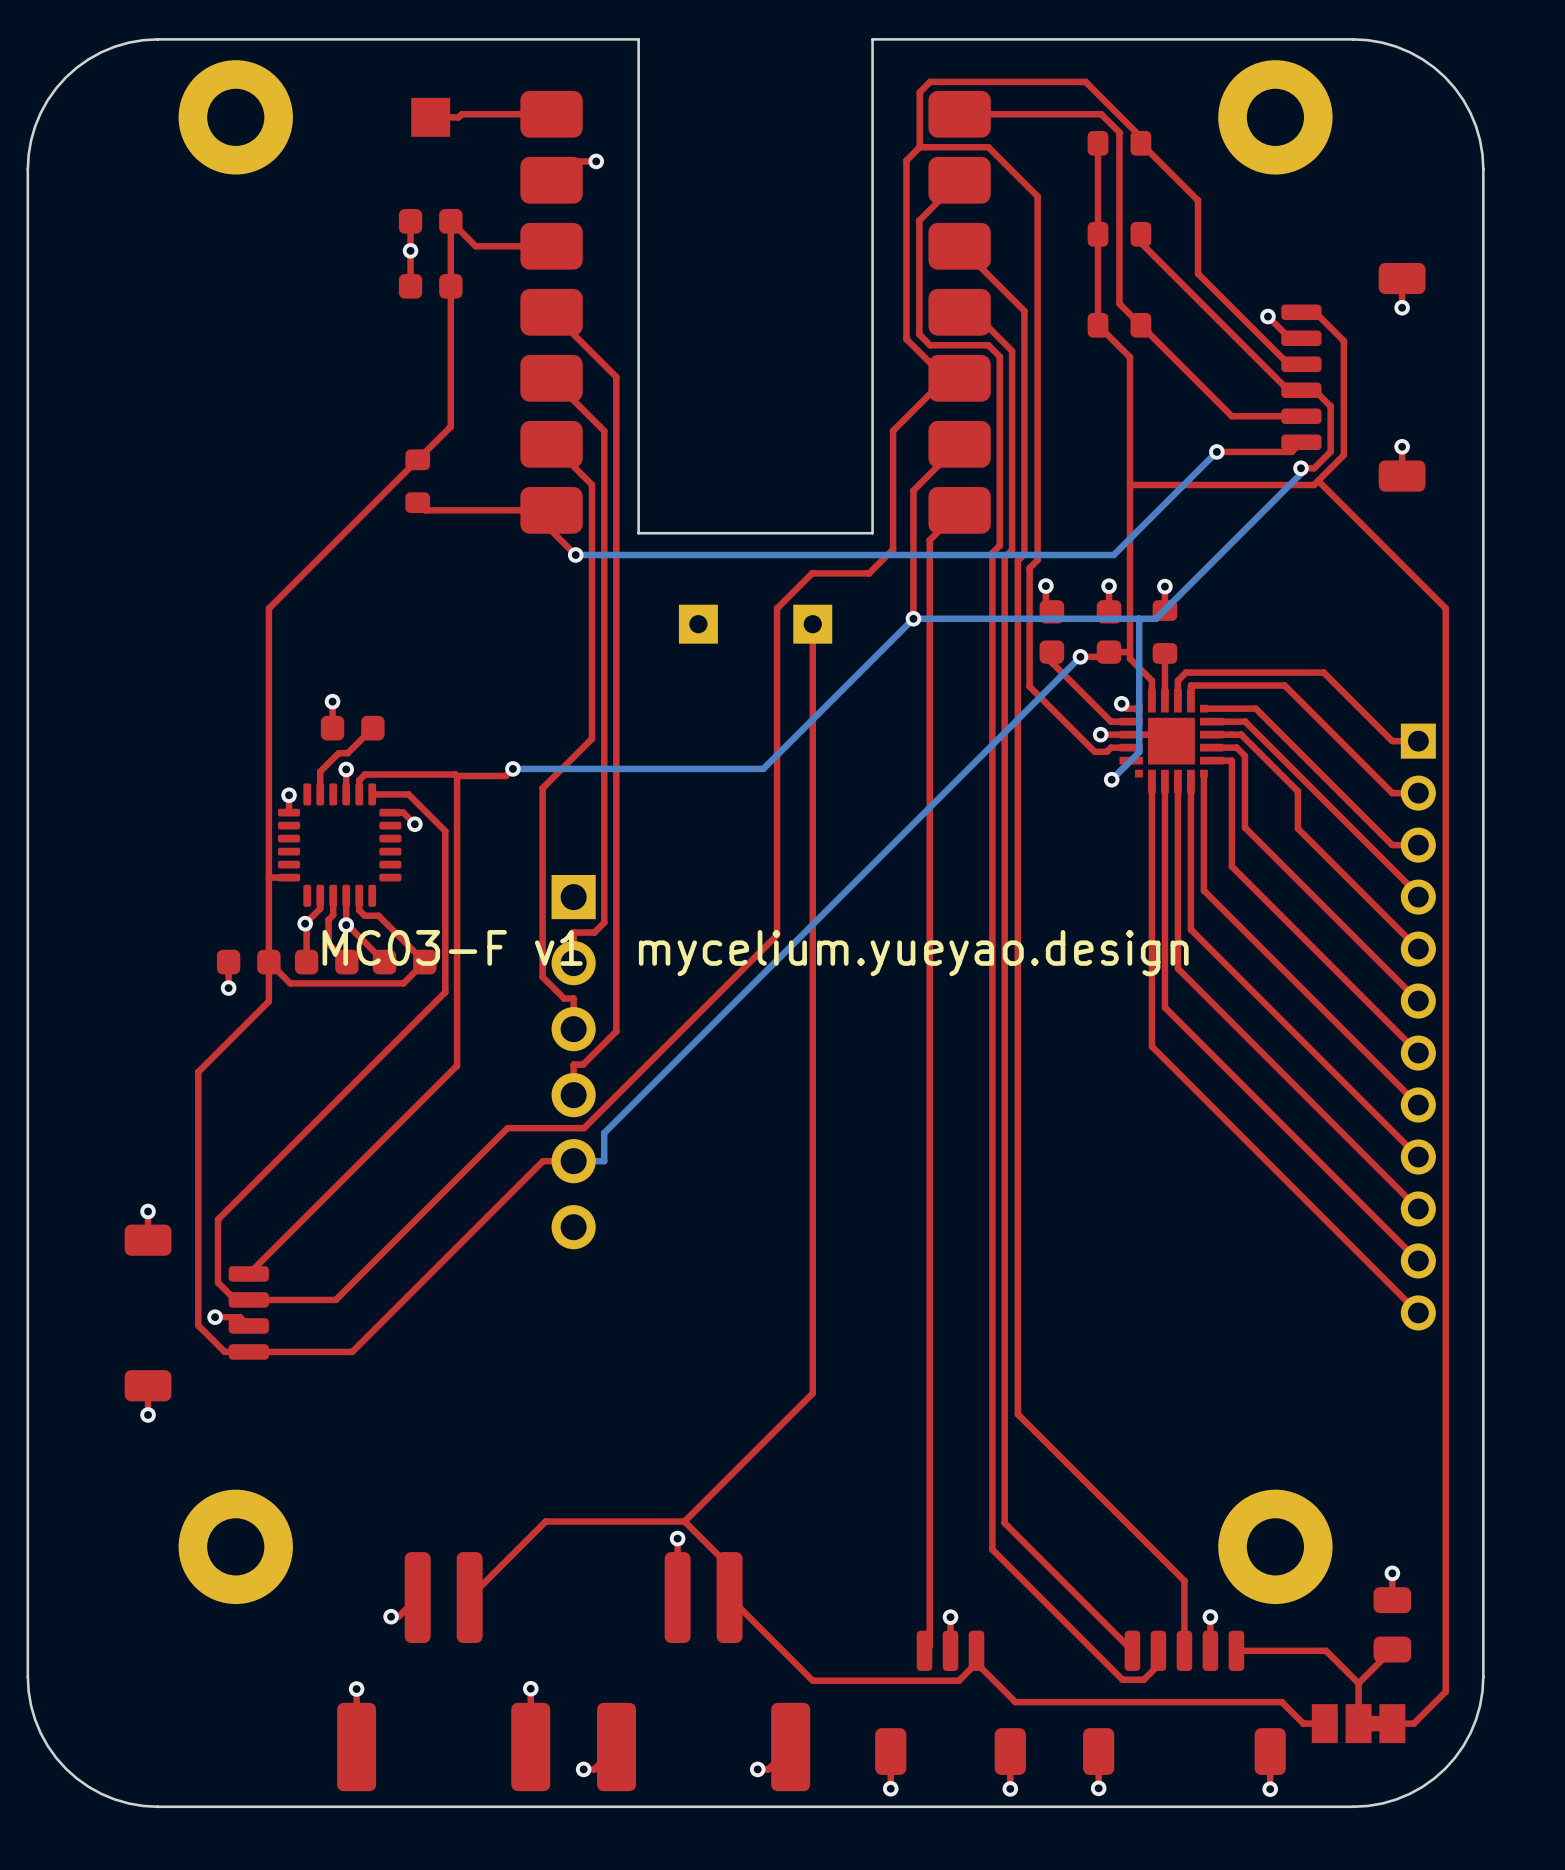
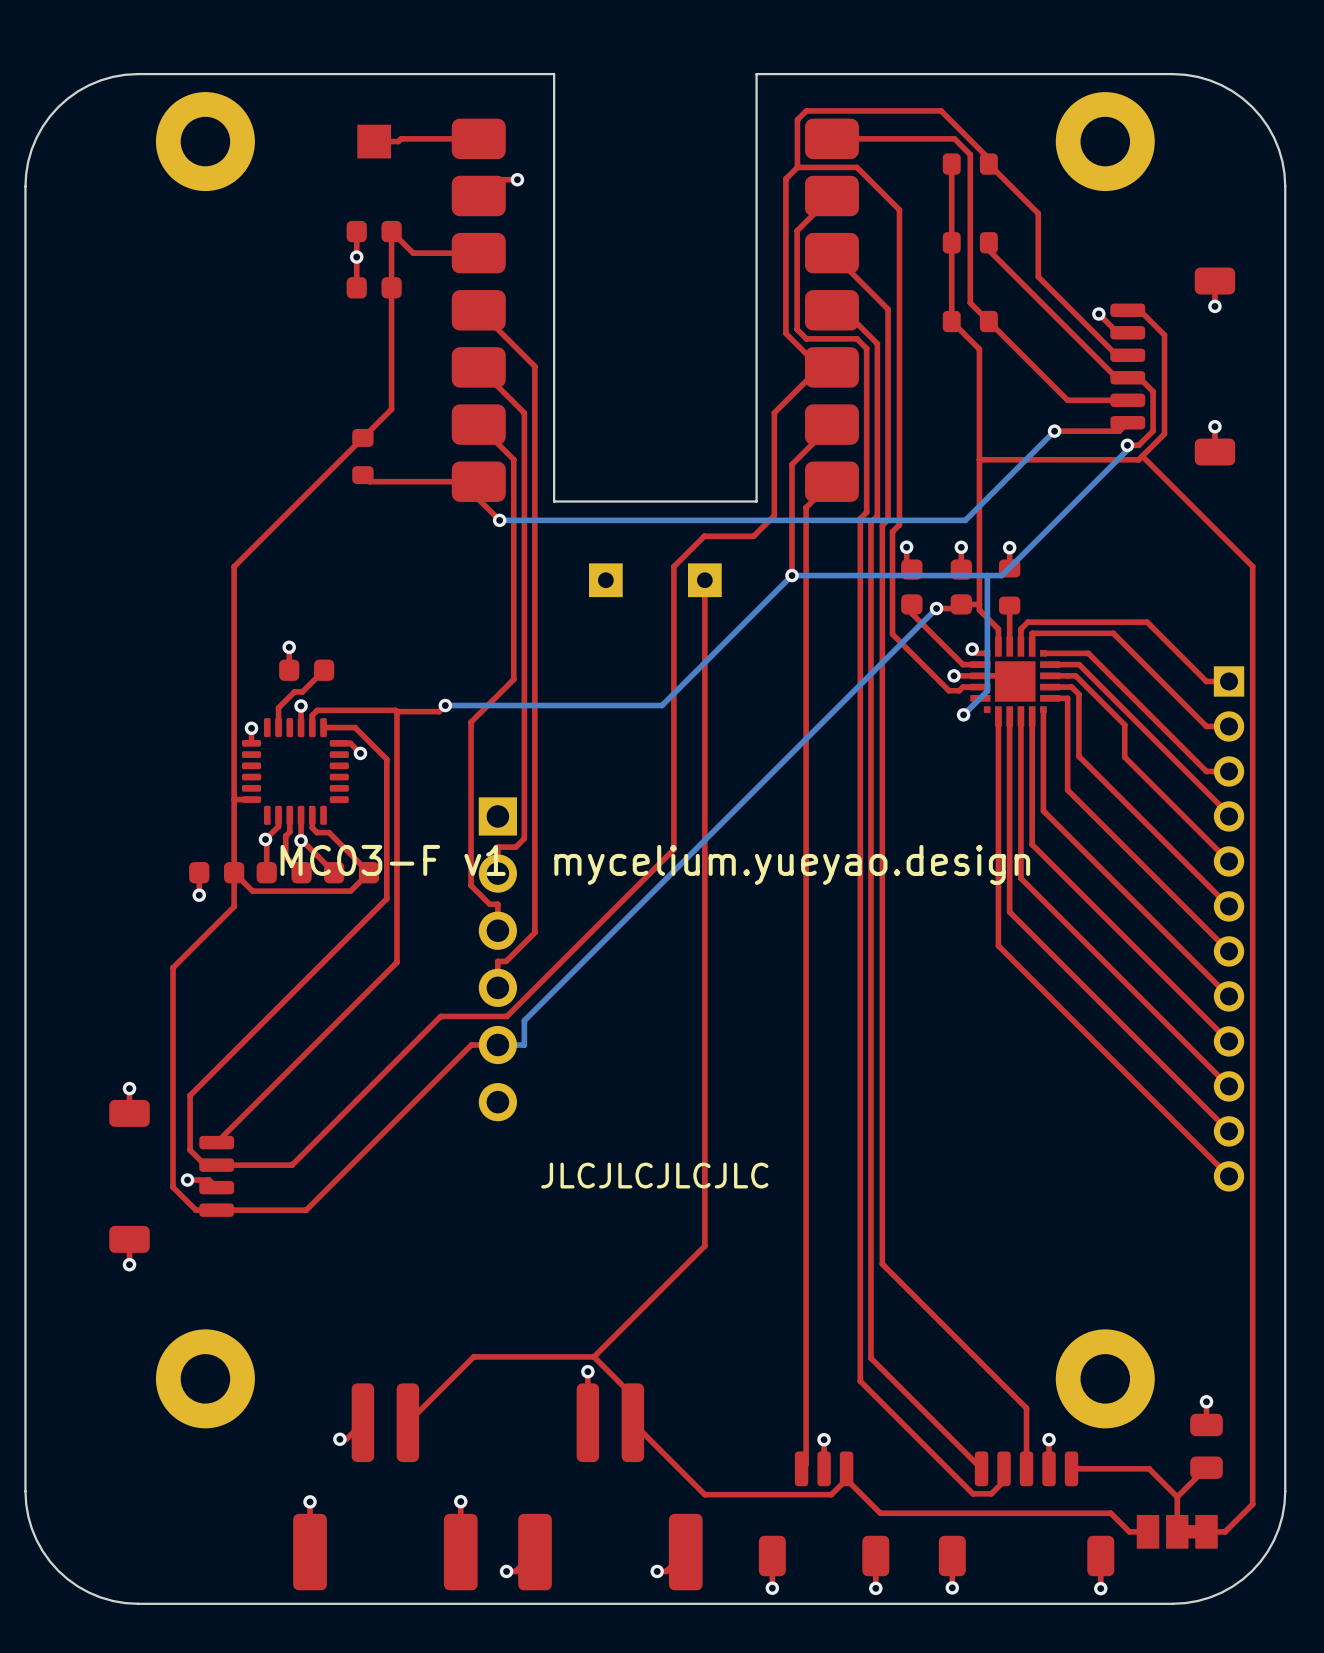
text: none -> JLCJLCJLCJLC (654, 1175)

